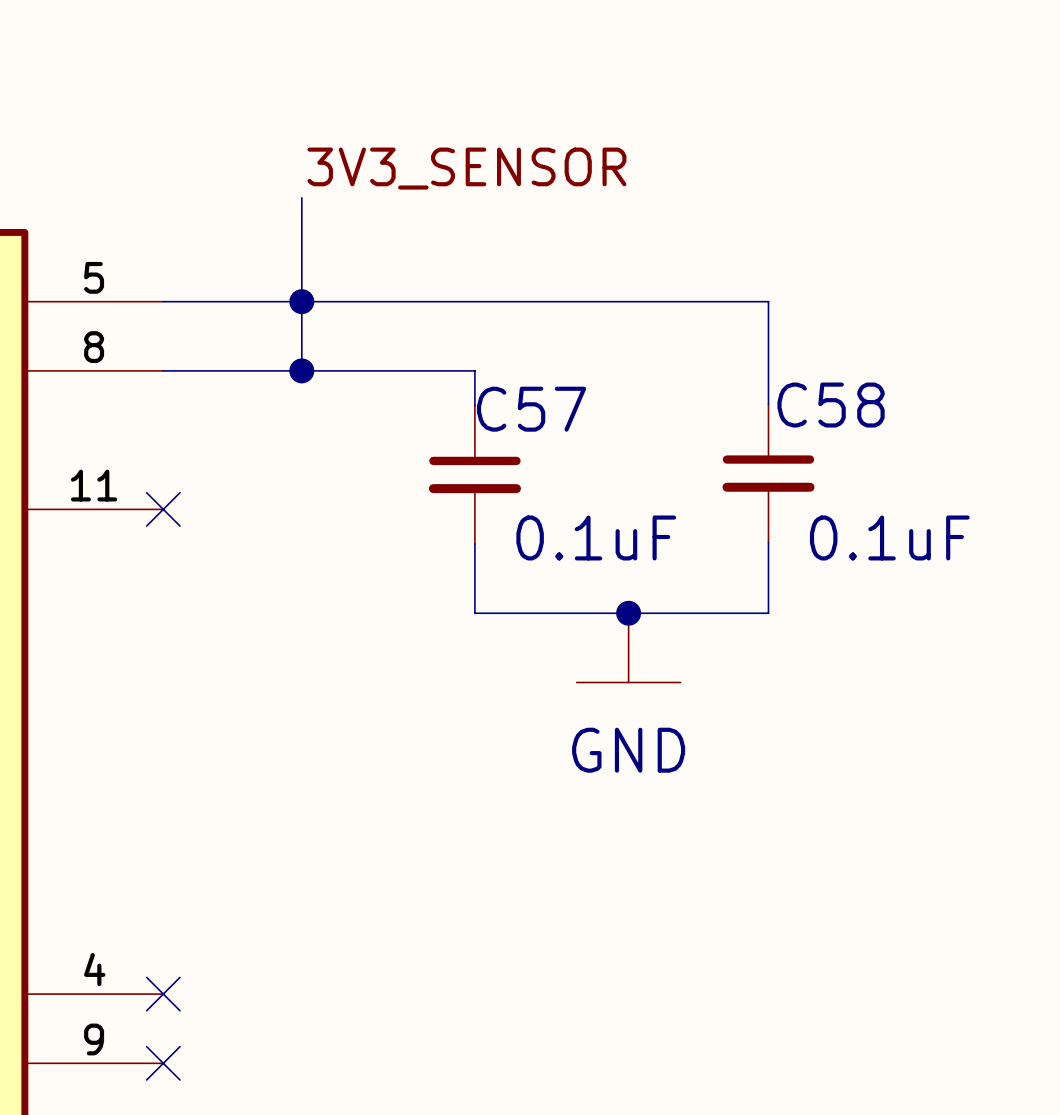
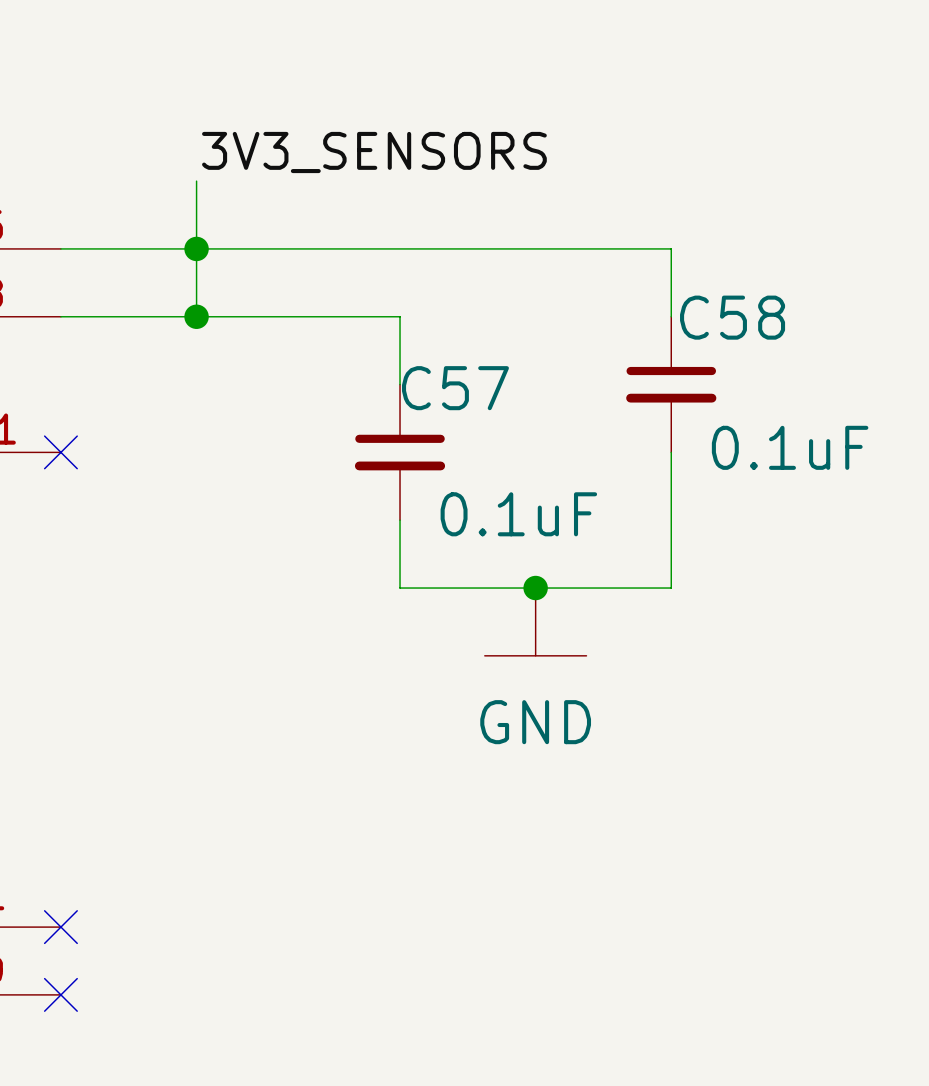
label: 3V3_SENSOR (466, 168) -> 3V3_SENSORS (374, 152)
wire: (301, 197) (301, 232) -> none
wire: (768, 301) (768, 404) -> (653, 248) (671, 248) (671, 316)
wire: (474, 370) (474, 405) -> (366, 316) (400, 316) (400, 384)
C58 position: (768, 473) -> (671, 384)
C57 position: (474, 474) -> (400, 452)
wire: none -> (671, 452) (671, 588) (400, 588) (400, 520)
wire: (768, 542) (768, 613) (474, 613) (474, 544) -> none
junction position: (628, 613) -> (535, 588)
power symbol position: GND (628, 647) -> GND (535, 621)

